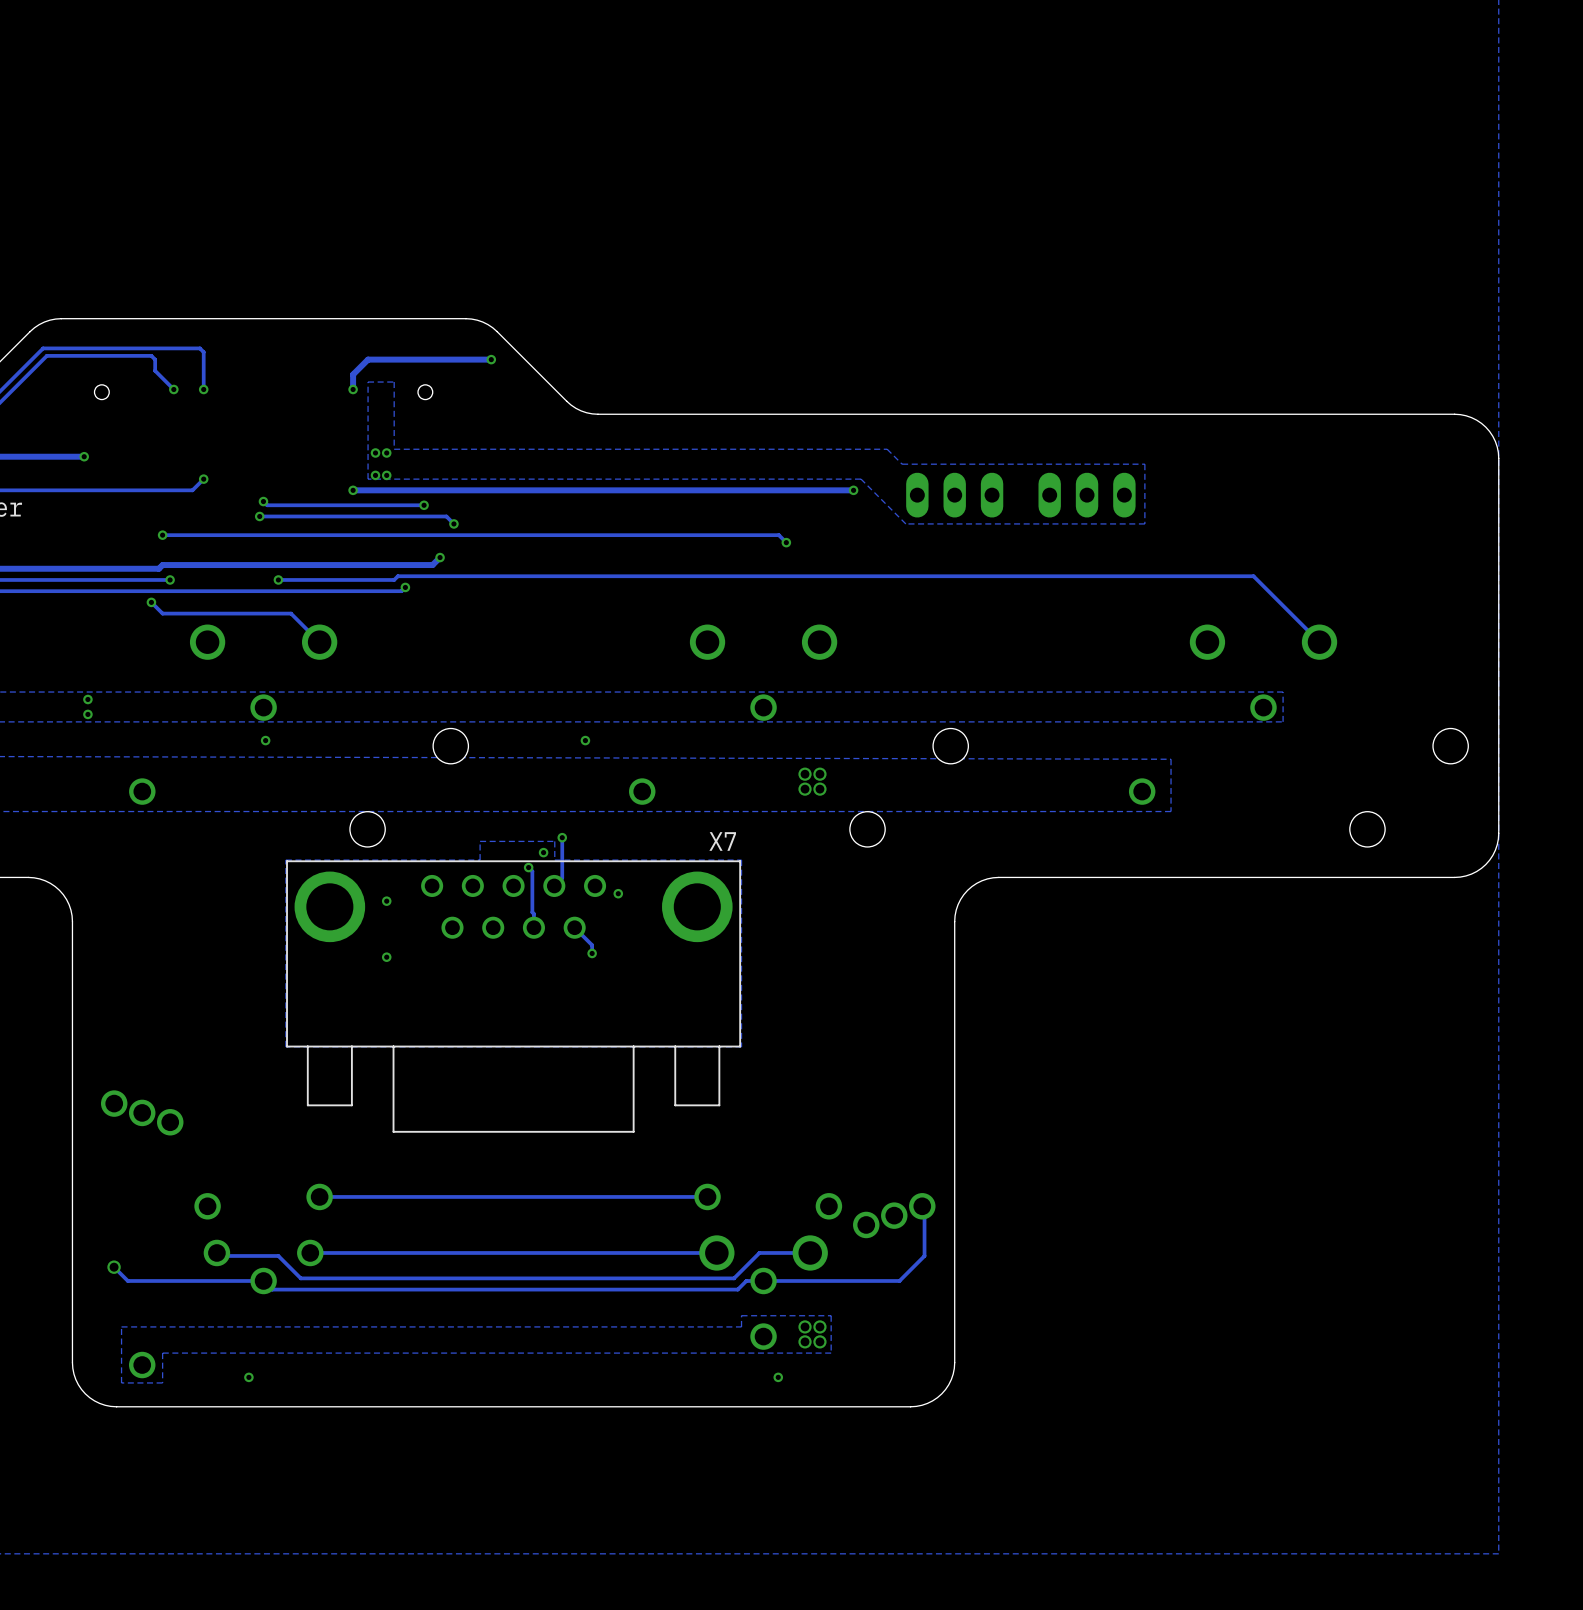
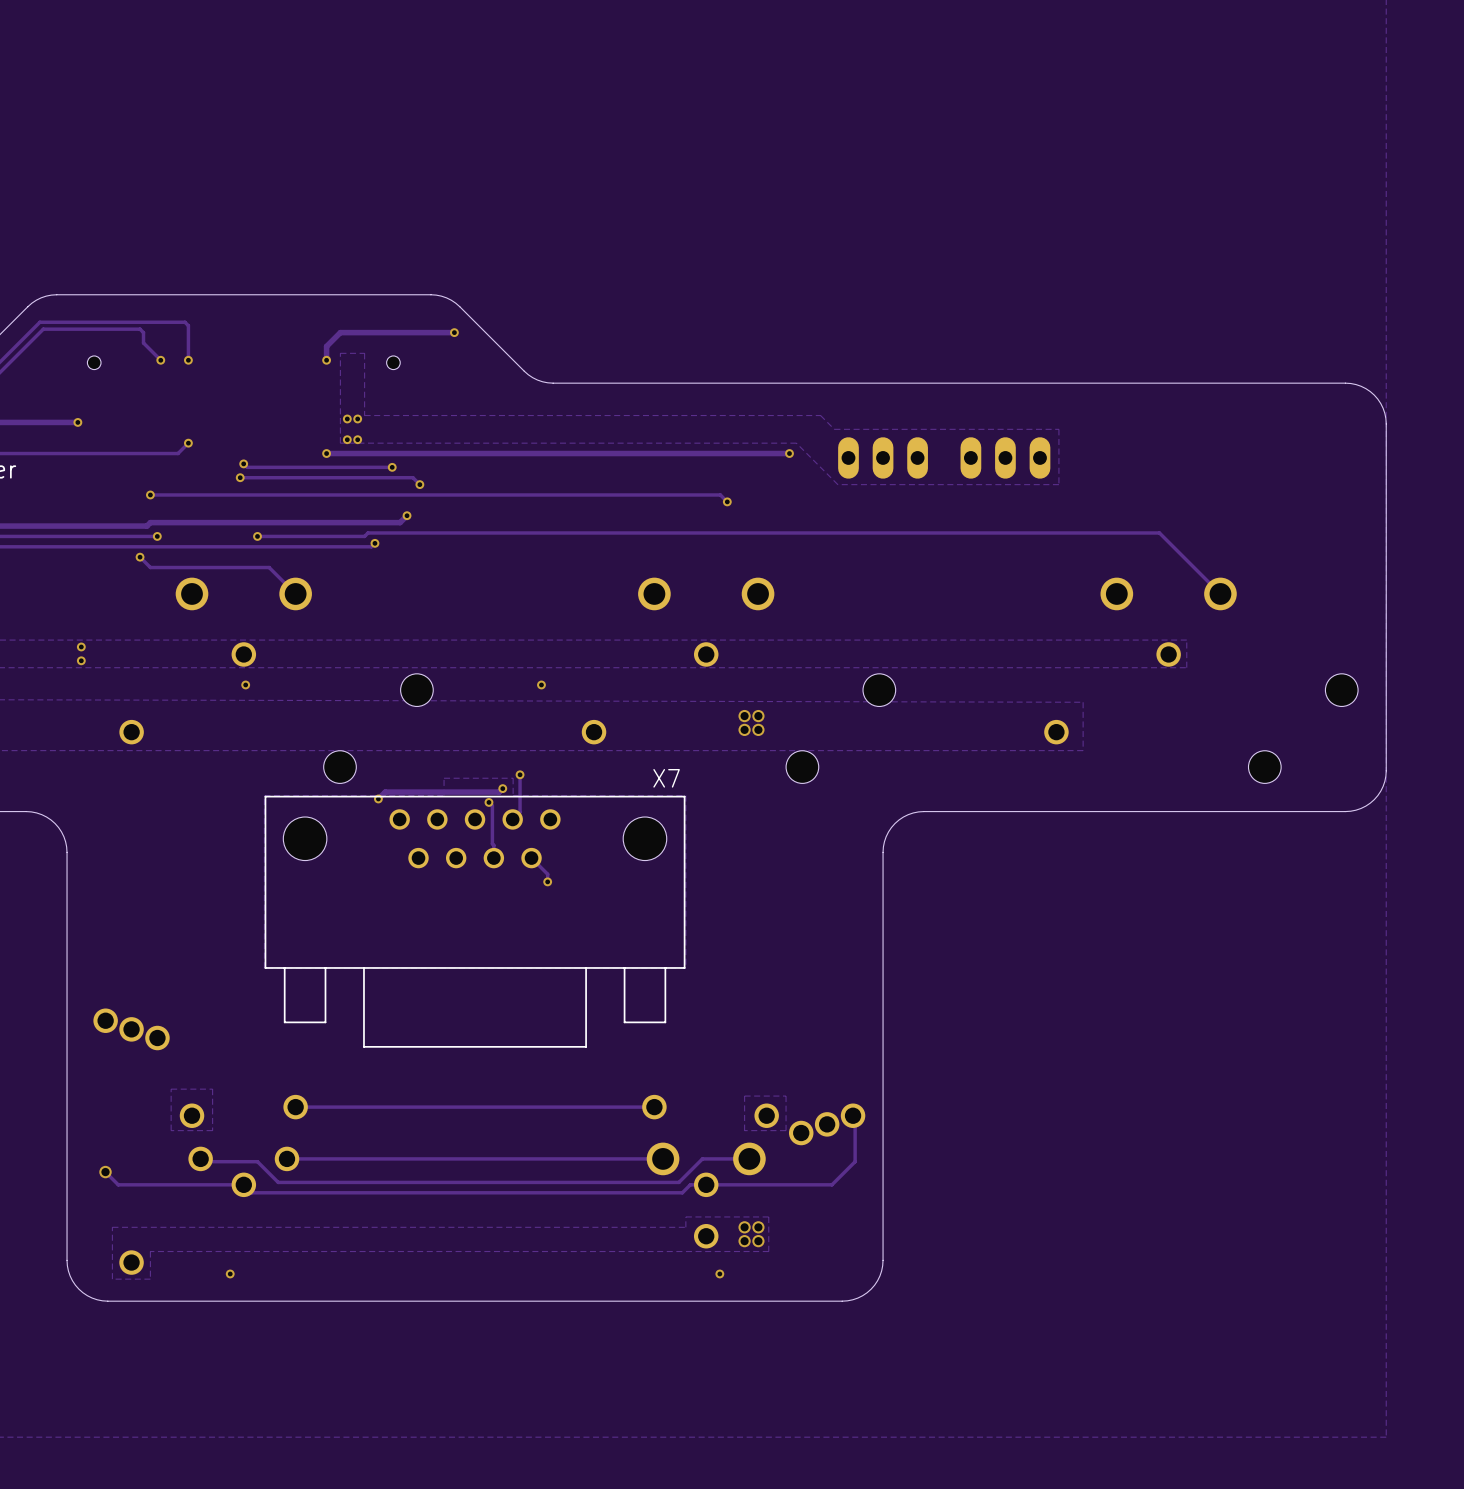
track: none -> (502, 788) (499, 792) (385, 792) (378, 798)
X7 footprint: [286, 860, 742, 1133] -> [264, 795, 686, 1048]
via: (618, 893) -> none
via position: (386, 901) -> (378, 798)
via: (386, 957) -> none
zone outline: none -> (212, 1089) (171, 1089) (171, 1130) (212, 1130) (212, 1089)
zone outline: none -> (786, 1096) (786, 1130) (744, 1130) (744, 1096) (786, 1096)

